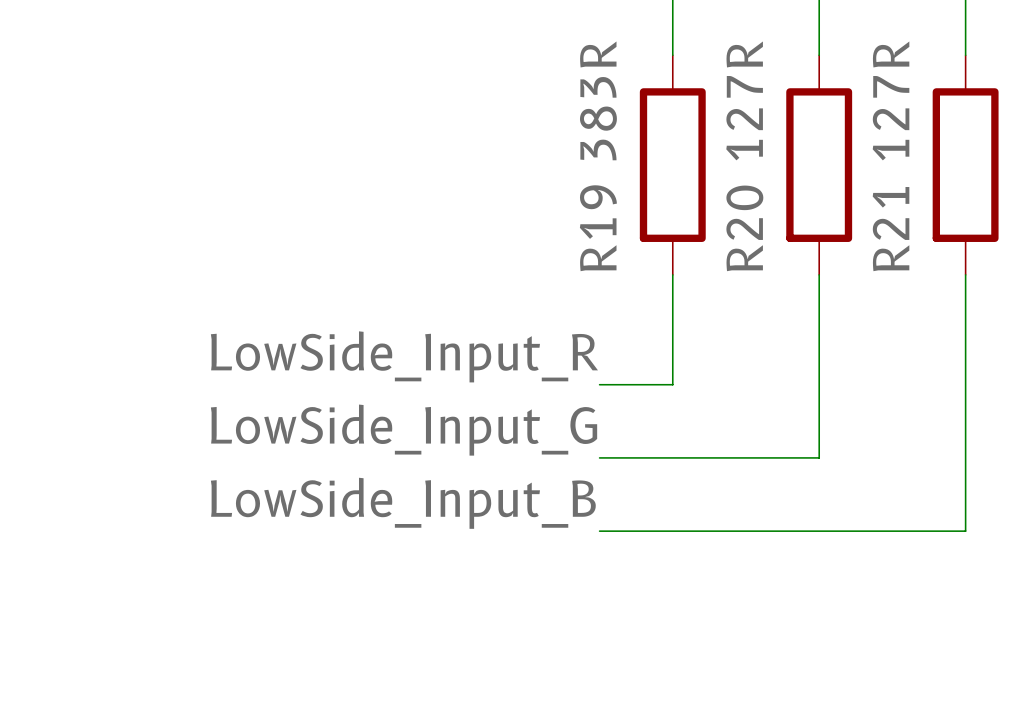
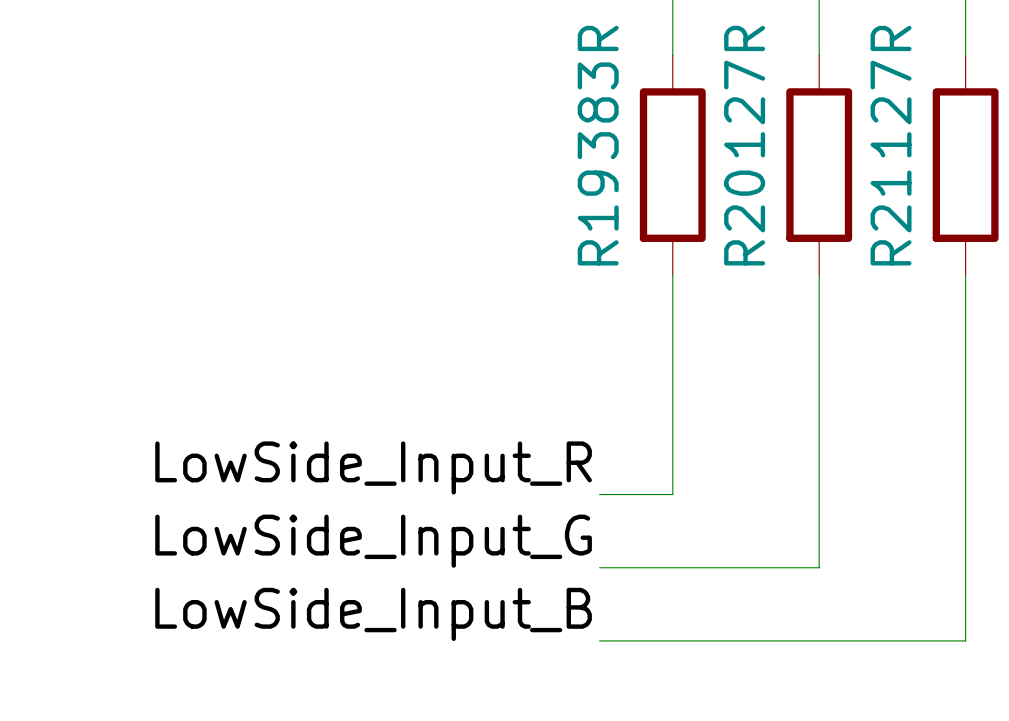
label position: LowSide_Input_R (404, 356) -> LowSide_Input_R (373, 467)
wire: (599, 384) (672, 384) -> (599, 494) (672, 494) (672, 384)
label position: LowSide_Input_G (404, 430) -> LowSide_Input_G (373, 541)
wire: (599, 457) (819, 457) -> (599, 567) (819, 567) (819, 457)
label position: LowSide_Input_B (403, 503) -> LowSide_Input_B (373, 614)
wire: (599, 531) (965, 531) -> (599, 640) (965, 640) (965, 531)

